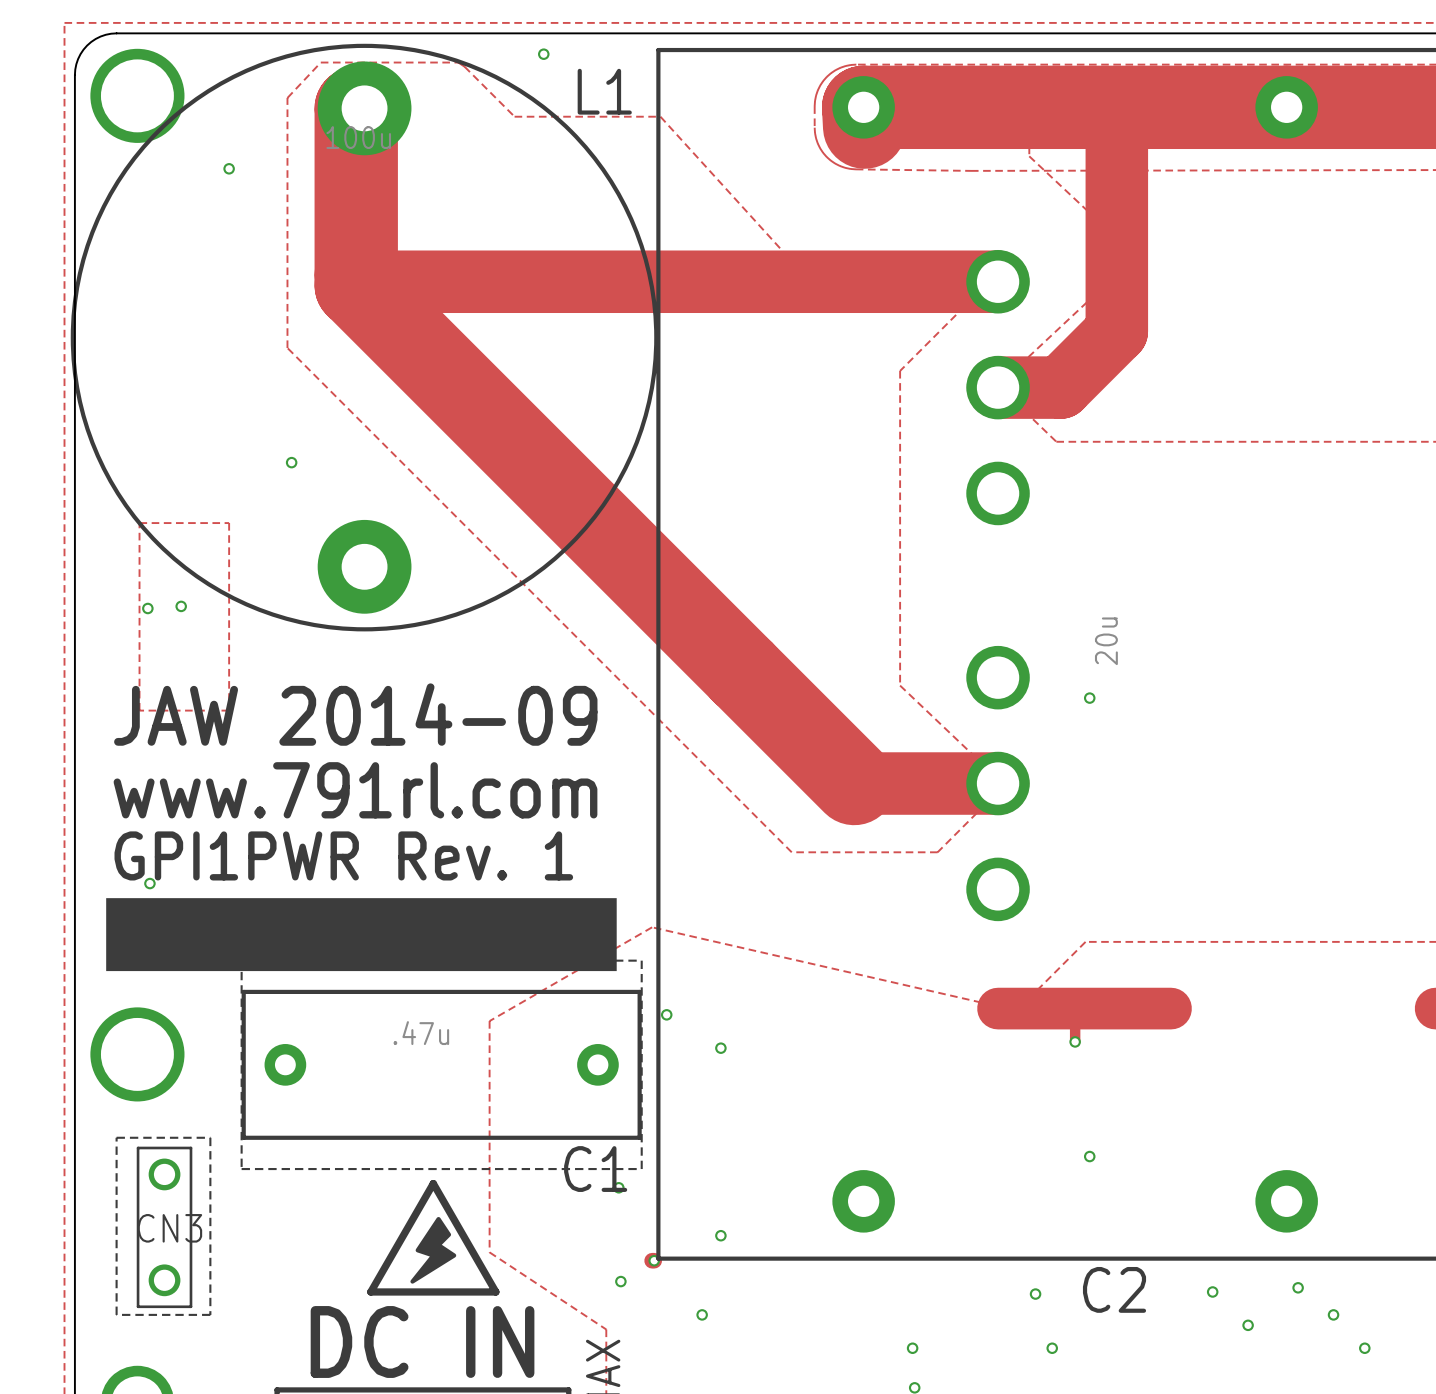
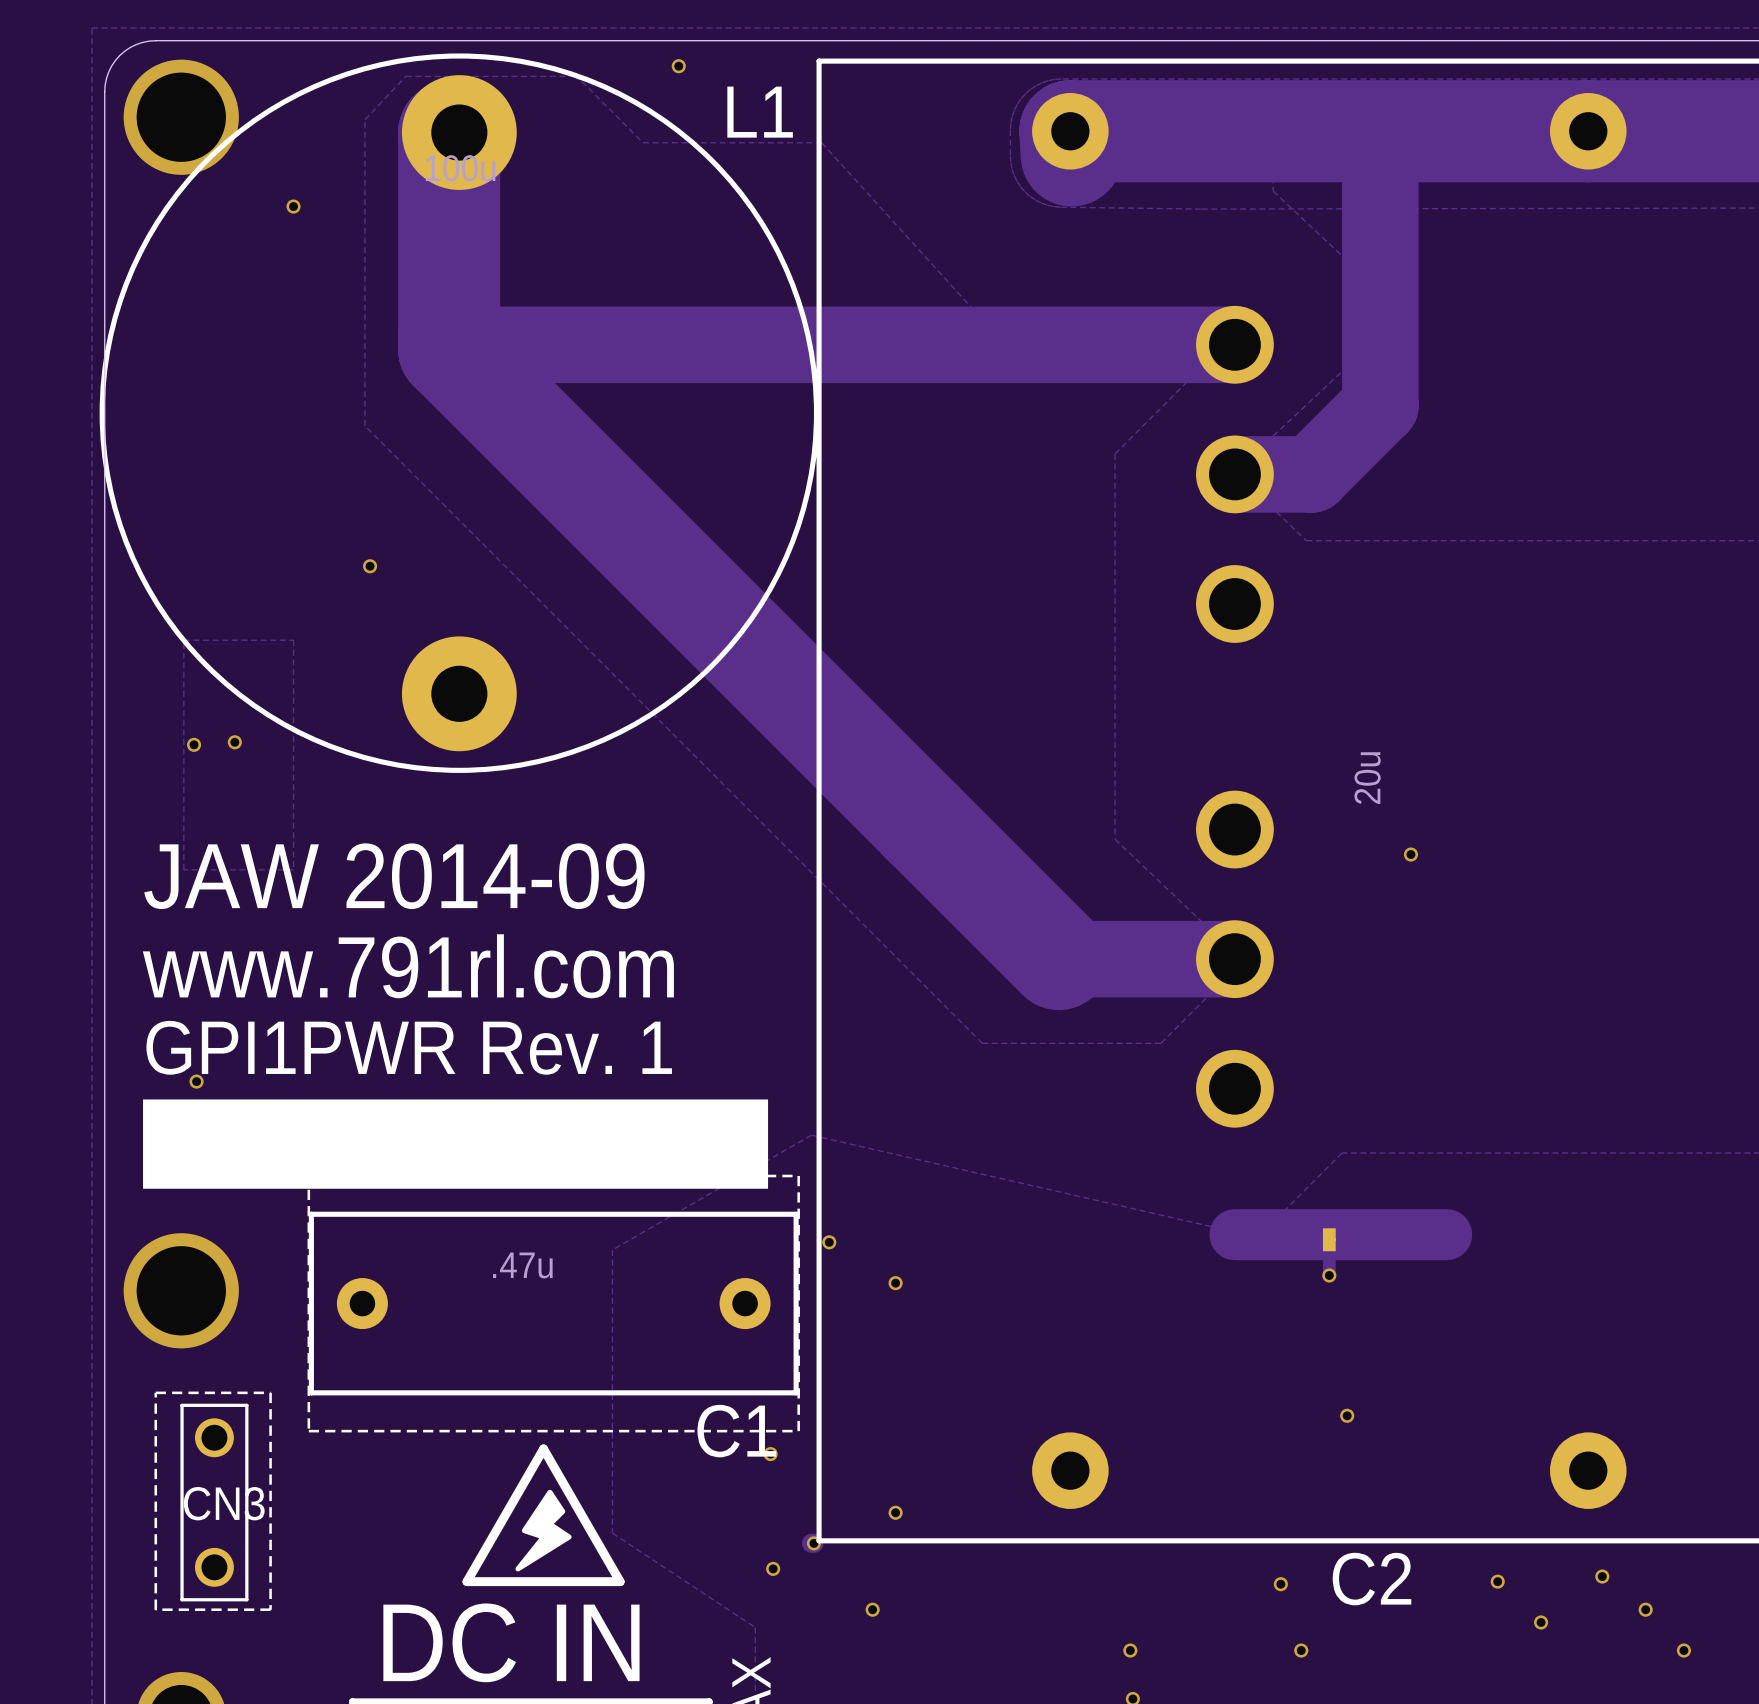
via position: (1089, 698) -> (1410, 854)

